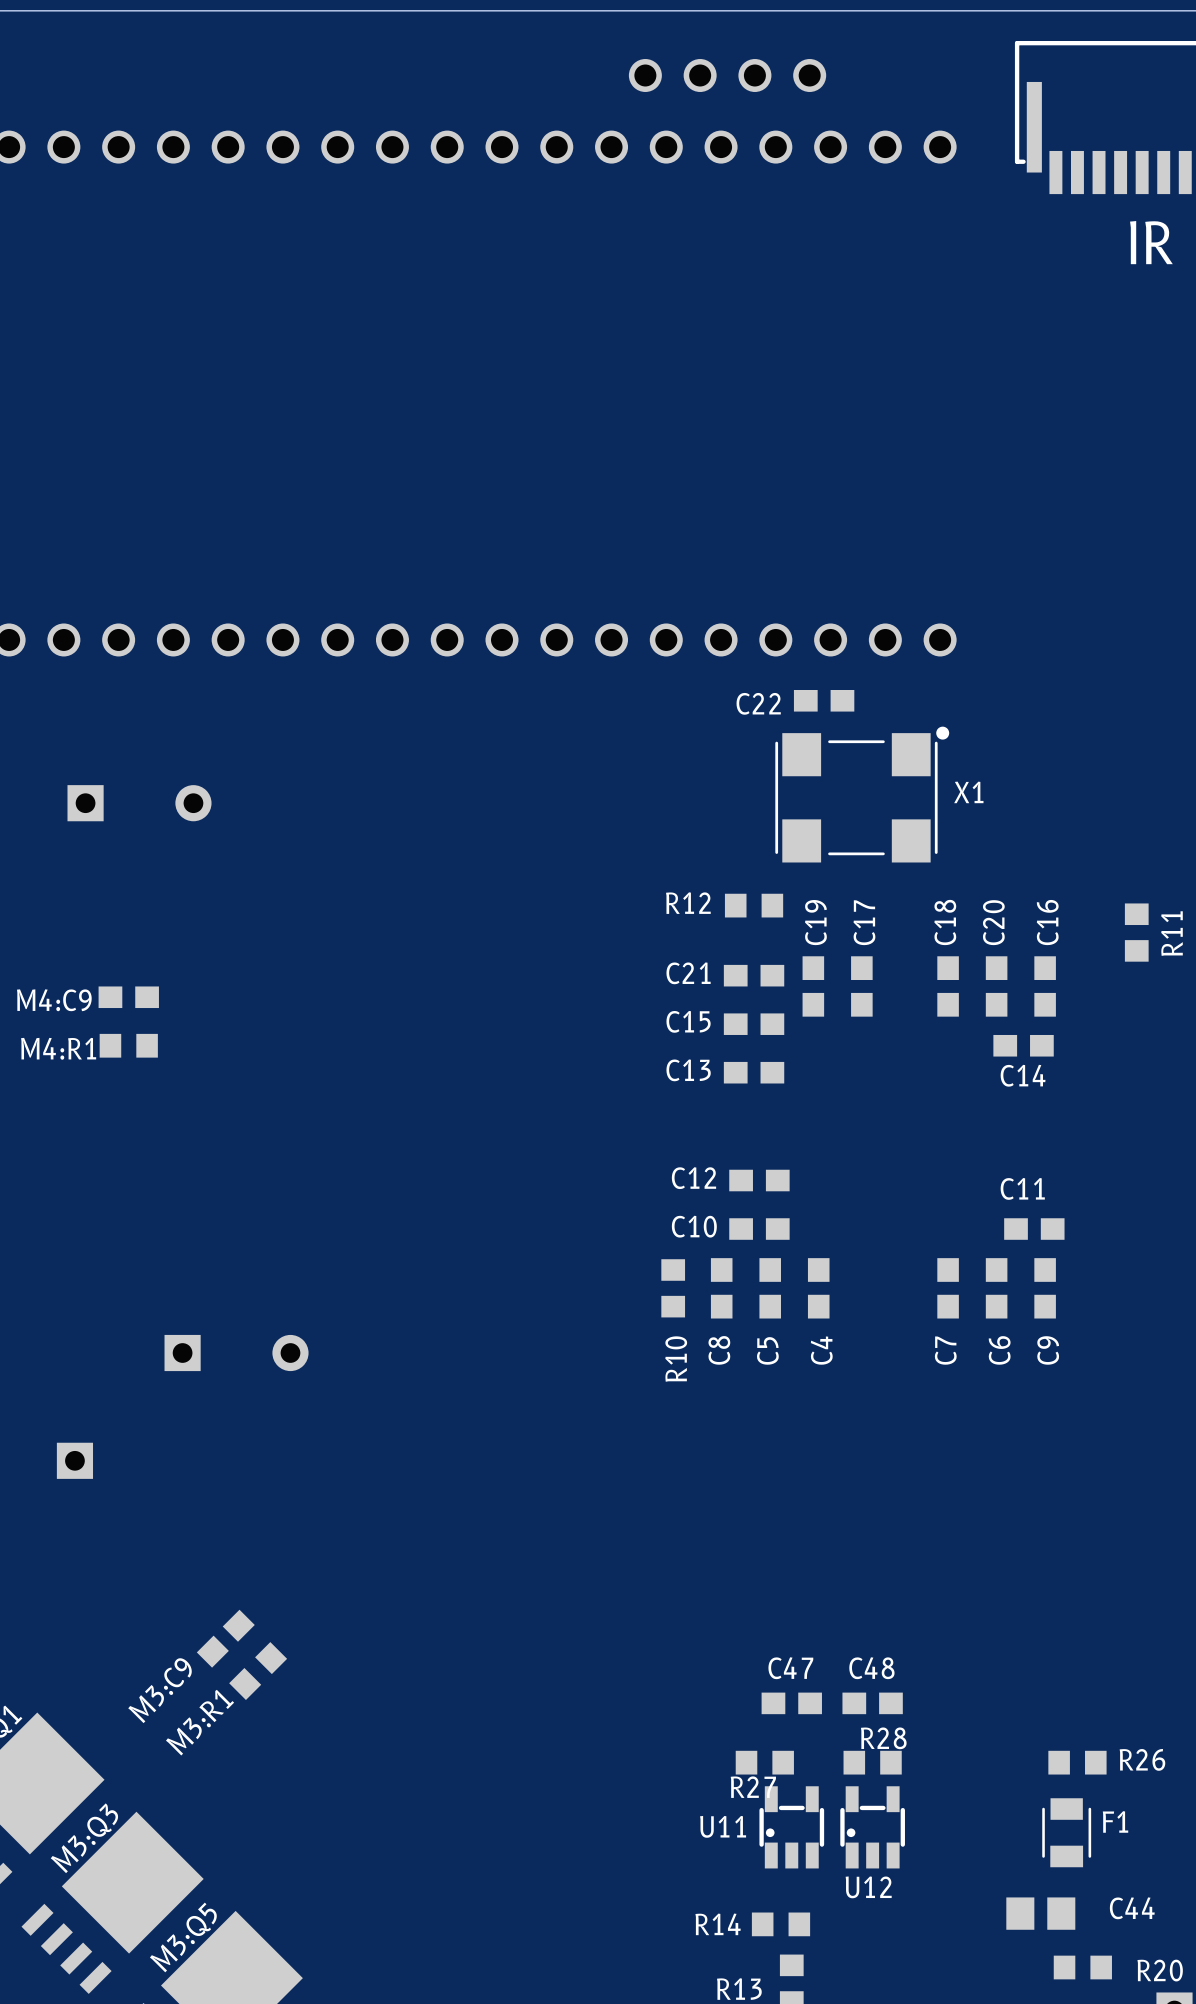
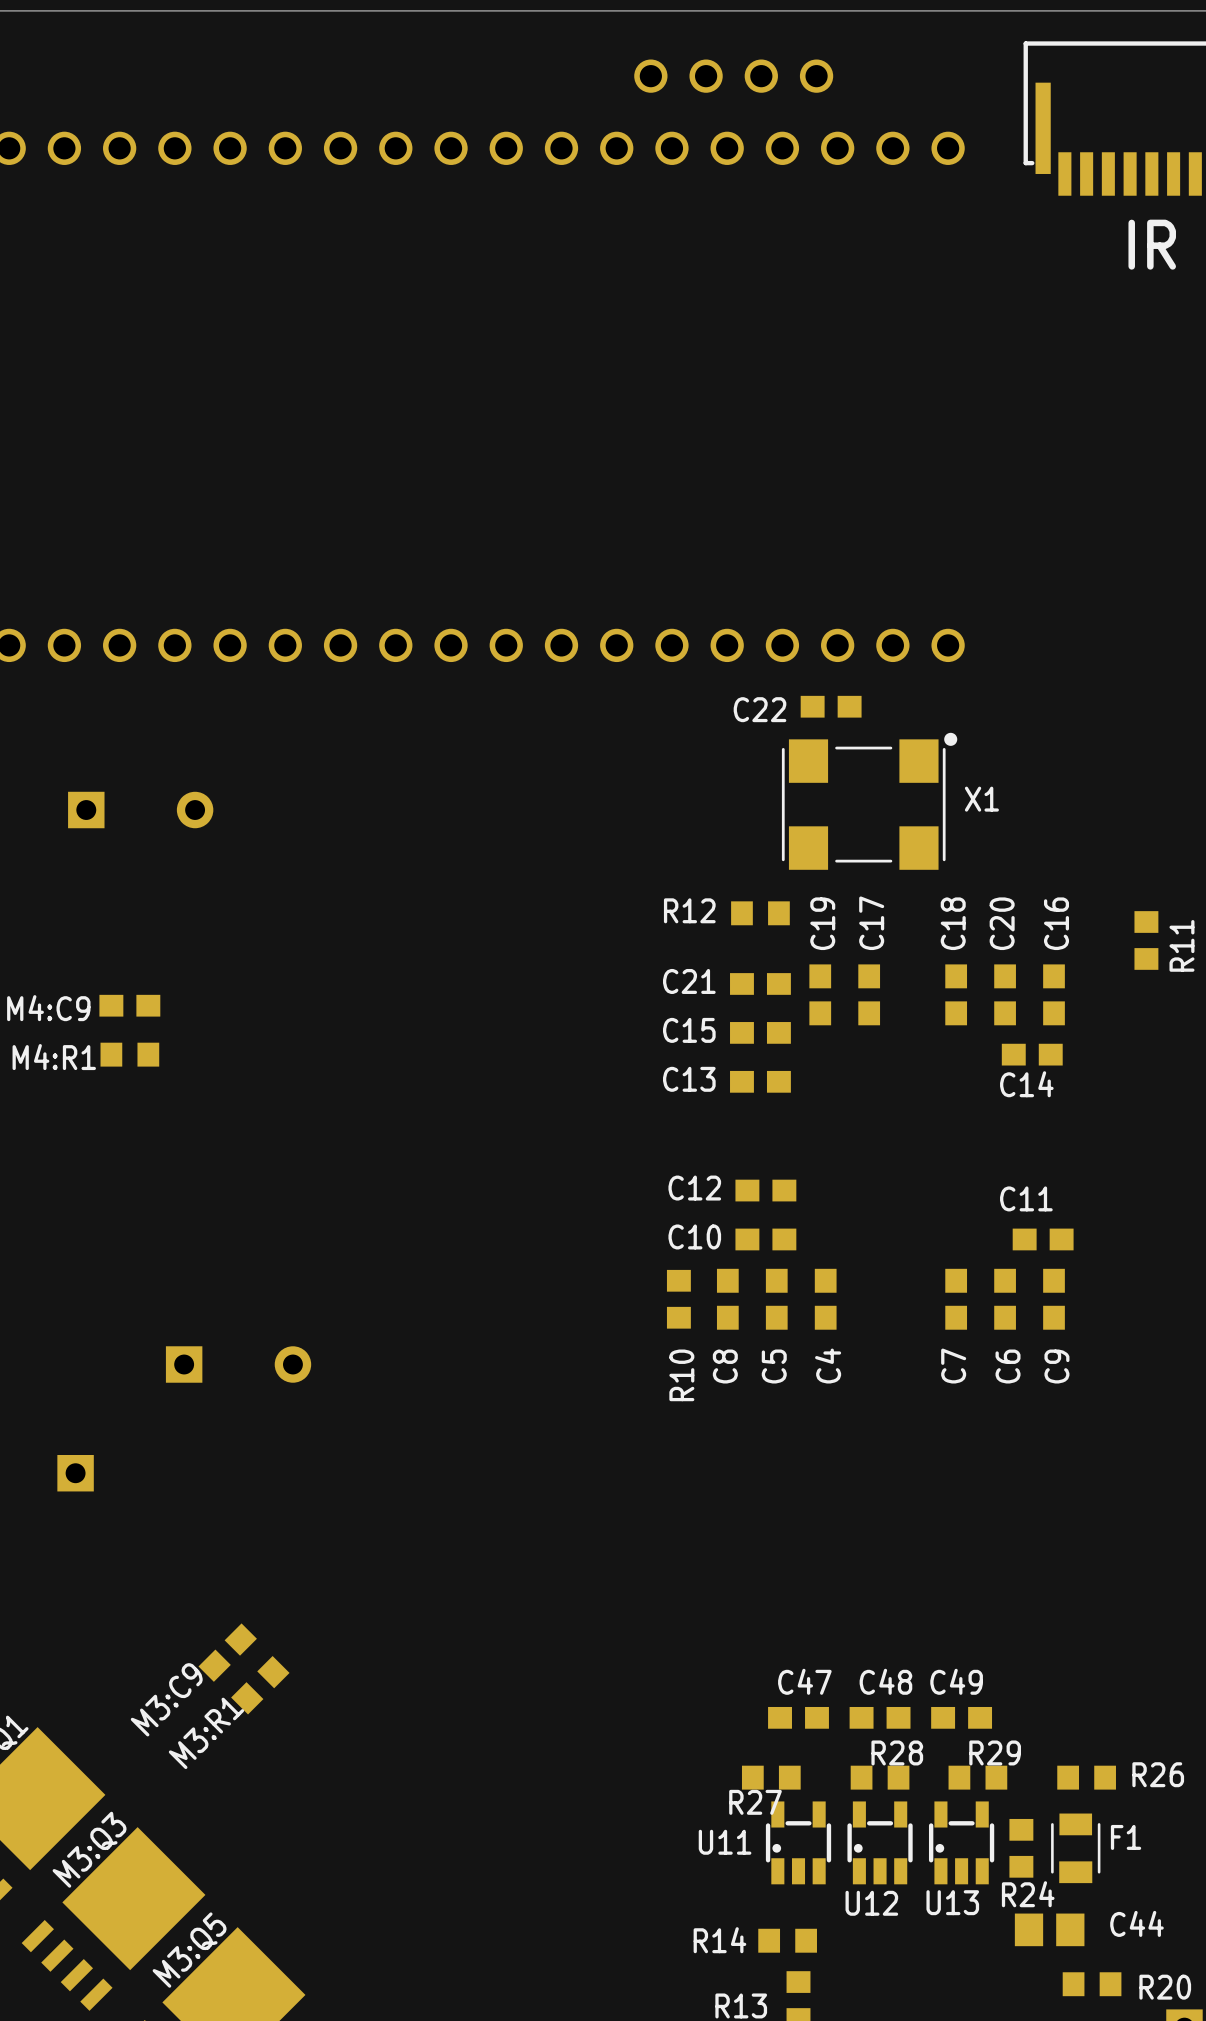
C49: none -> (961, 1717)
R29: none -> (977, 1777)
U13: none -> (961, 1842)
R24: none -> (1021, 1848)

